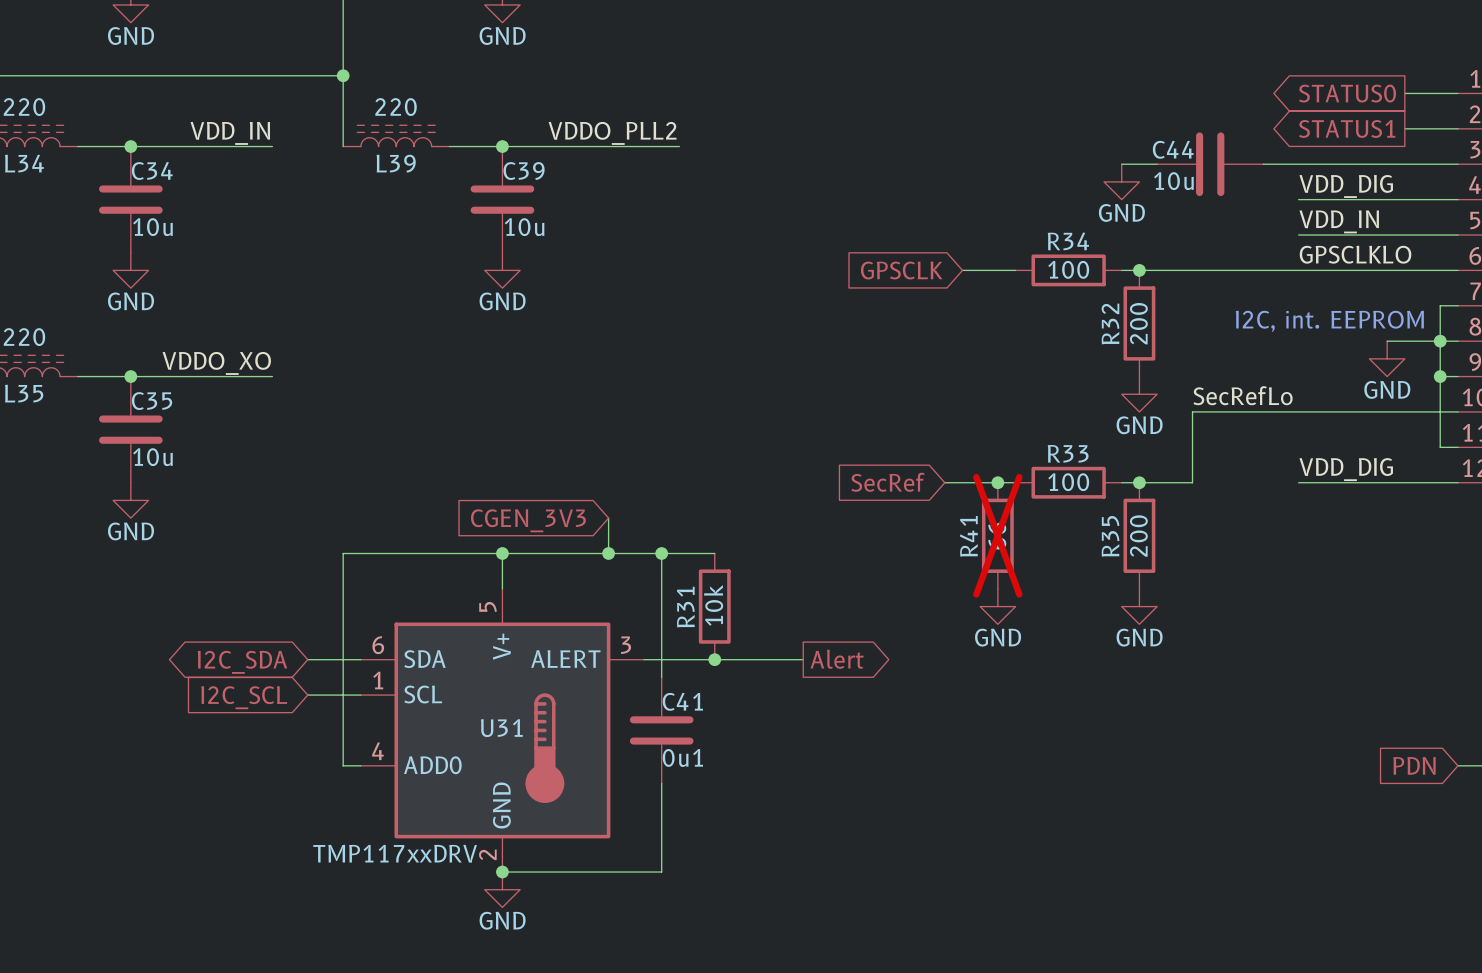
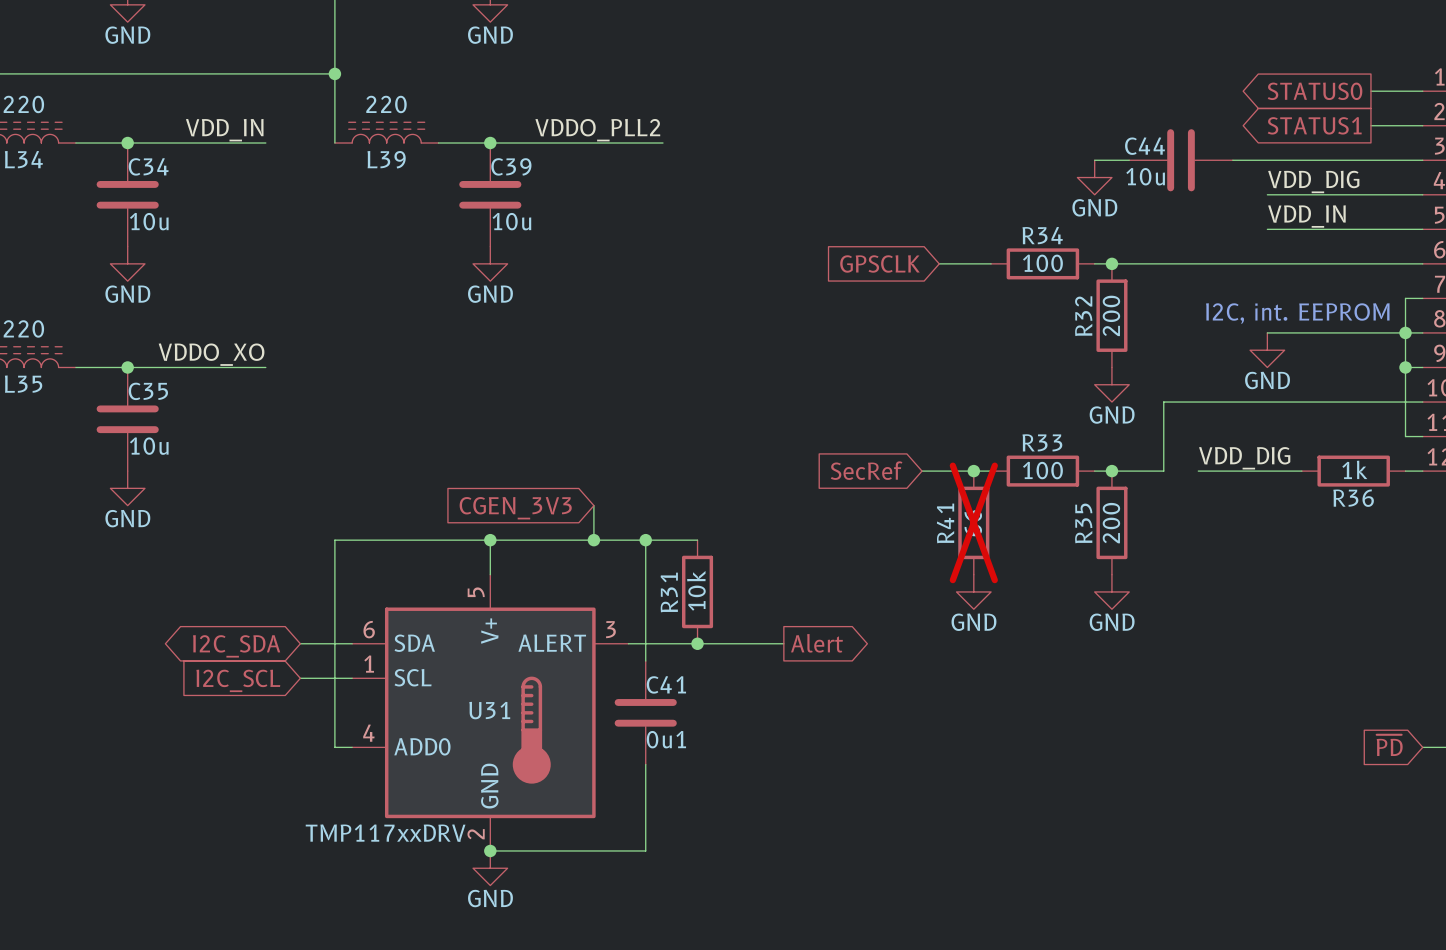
label: GPSCLKLO (1355, 254) -> none
wire: none -> (1267, 332) (1353, 332)
power symbol position: GND (1387, 358) -> GND (1267, 350)
label: SecRefLo (1243, 395) -> none
label position: VDD_DIG (1346, 469) -> VDD_DIG (1244, 458)
wire: none -> (1198, 471) (1267, 471)
wire: (1334, 482) (1440, 482) -> none
R36: none -> 1k (1353, 471)
global label: PDN (1414, 765) -> ~{PD} (1389, 745)

